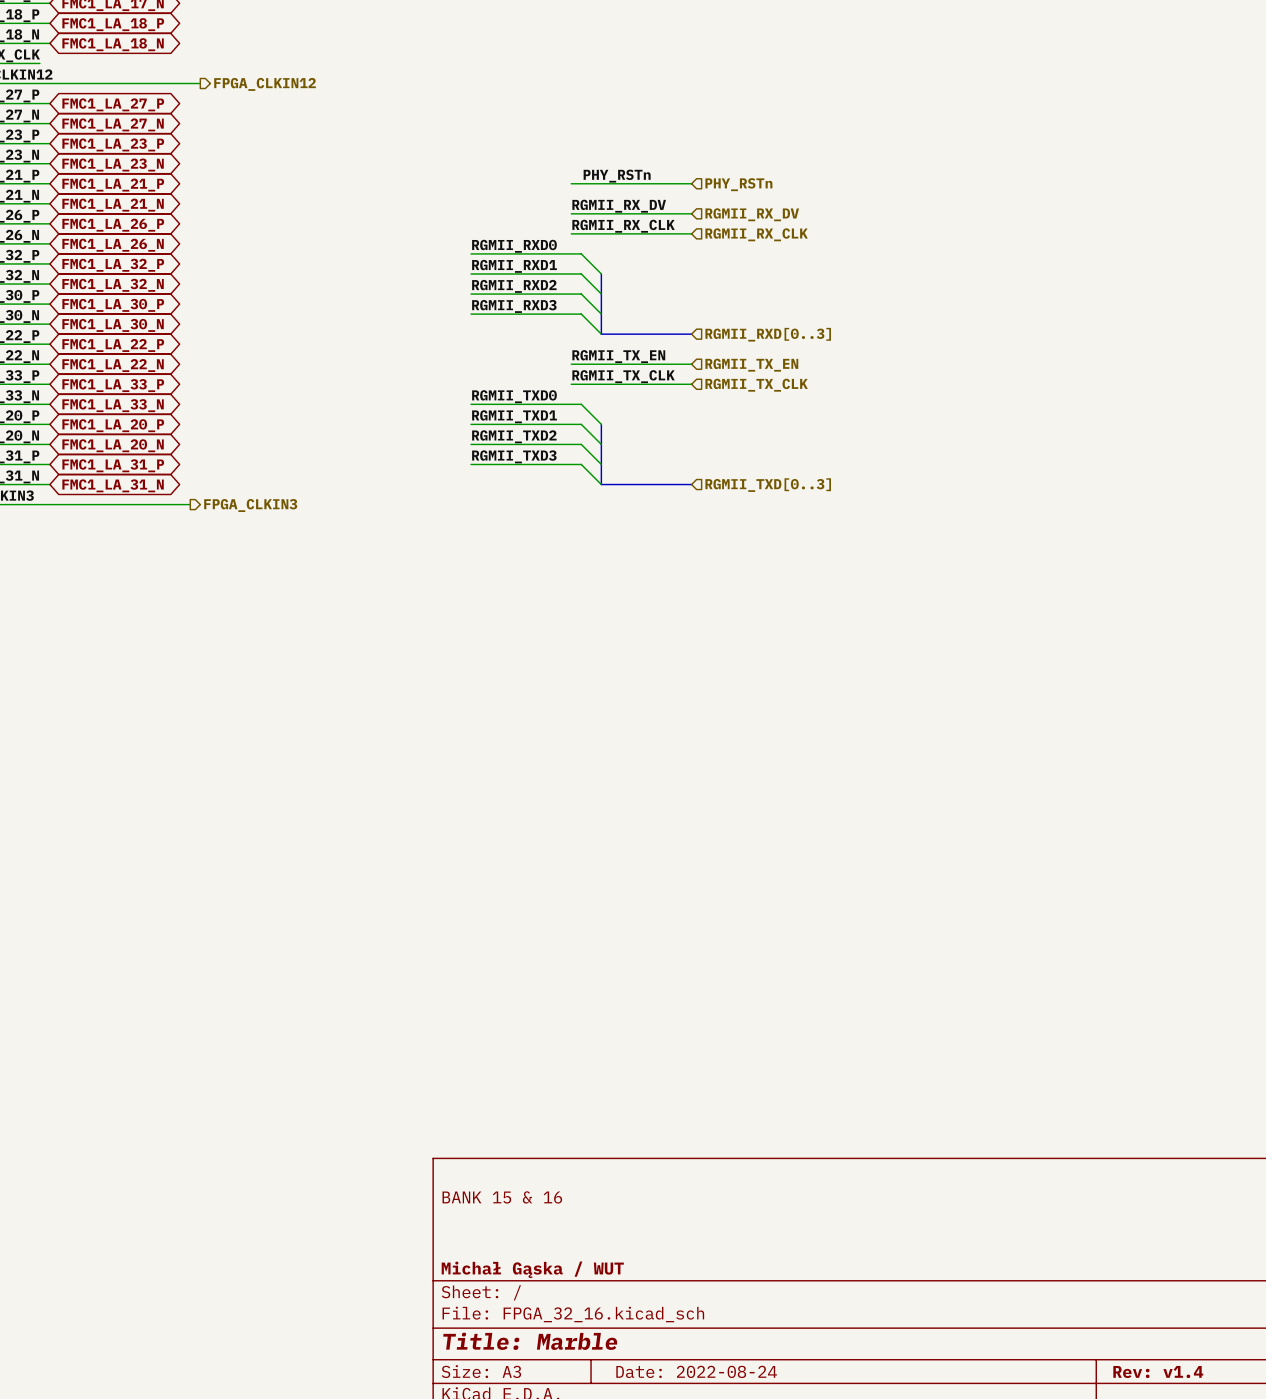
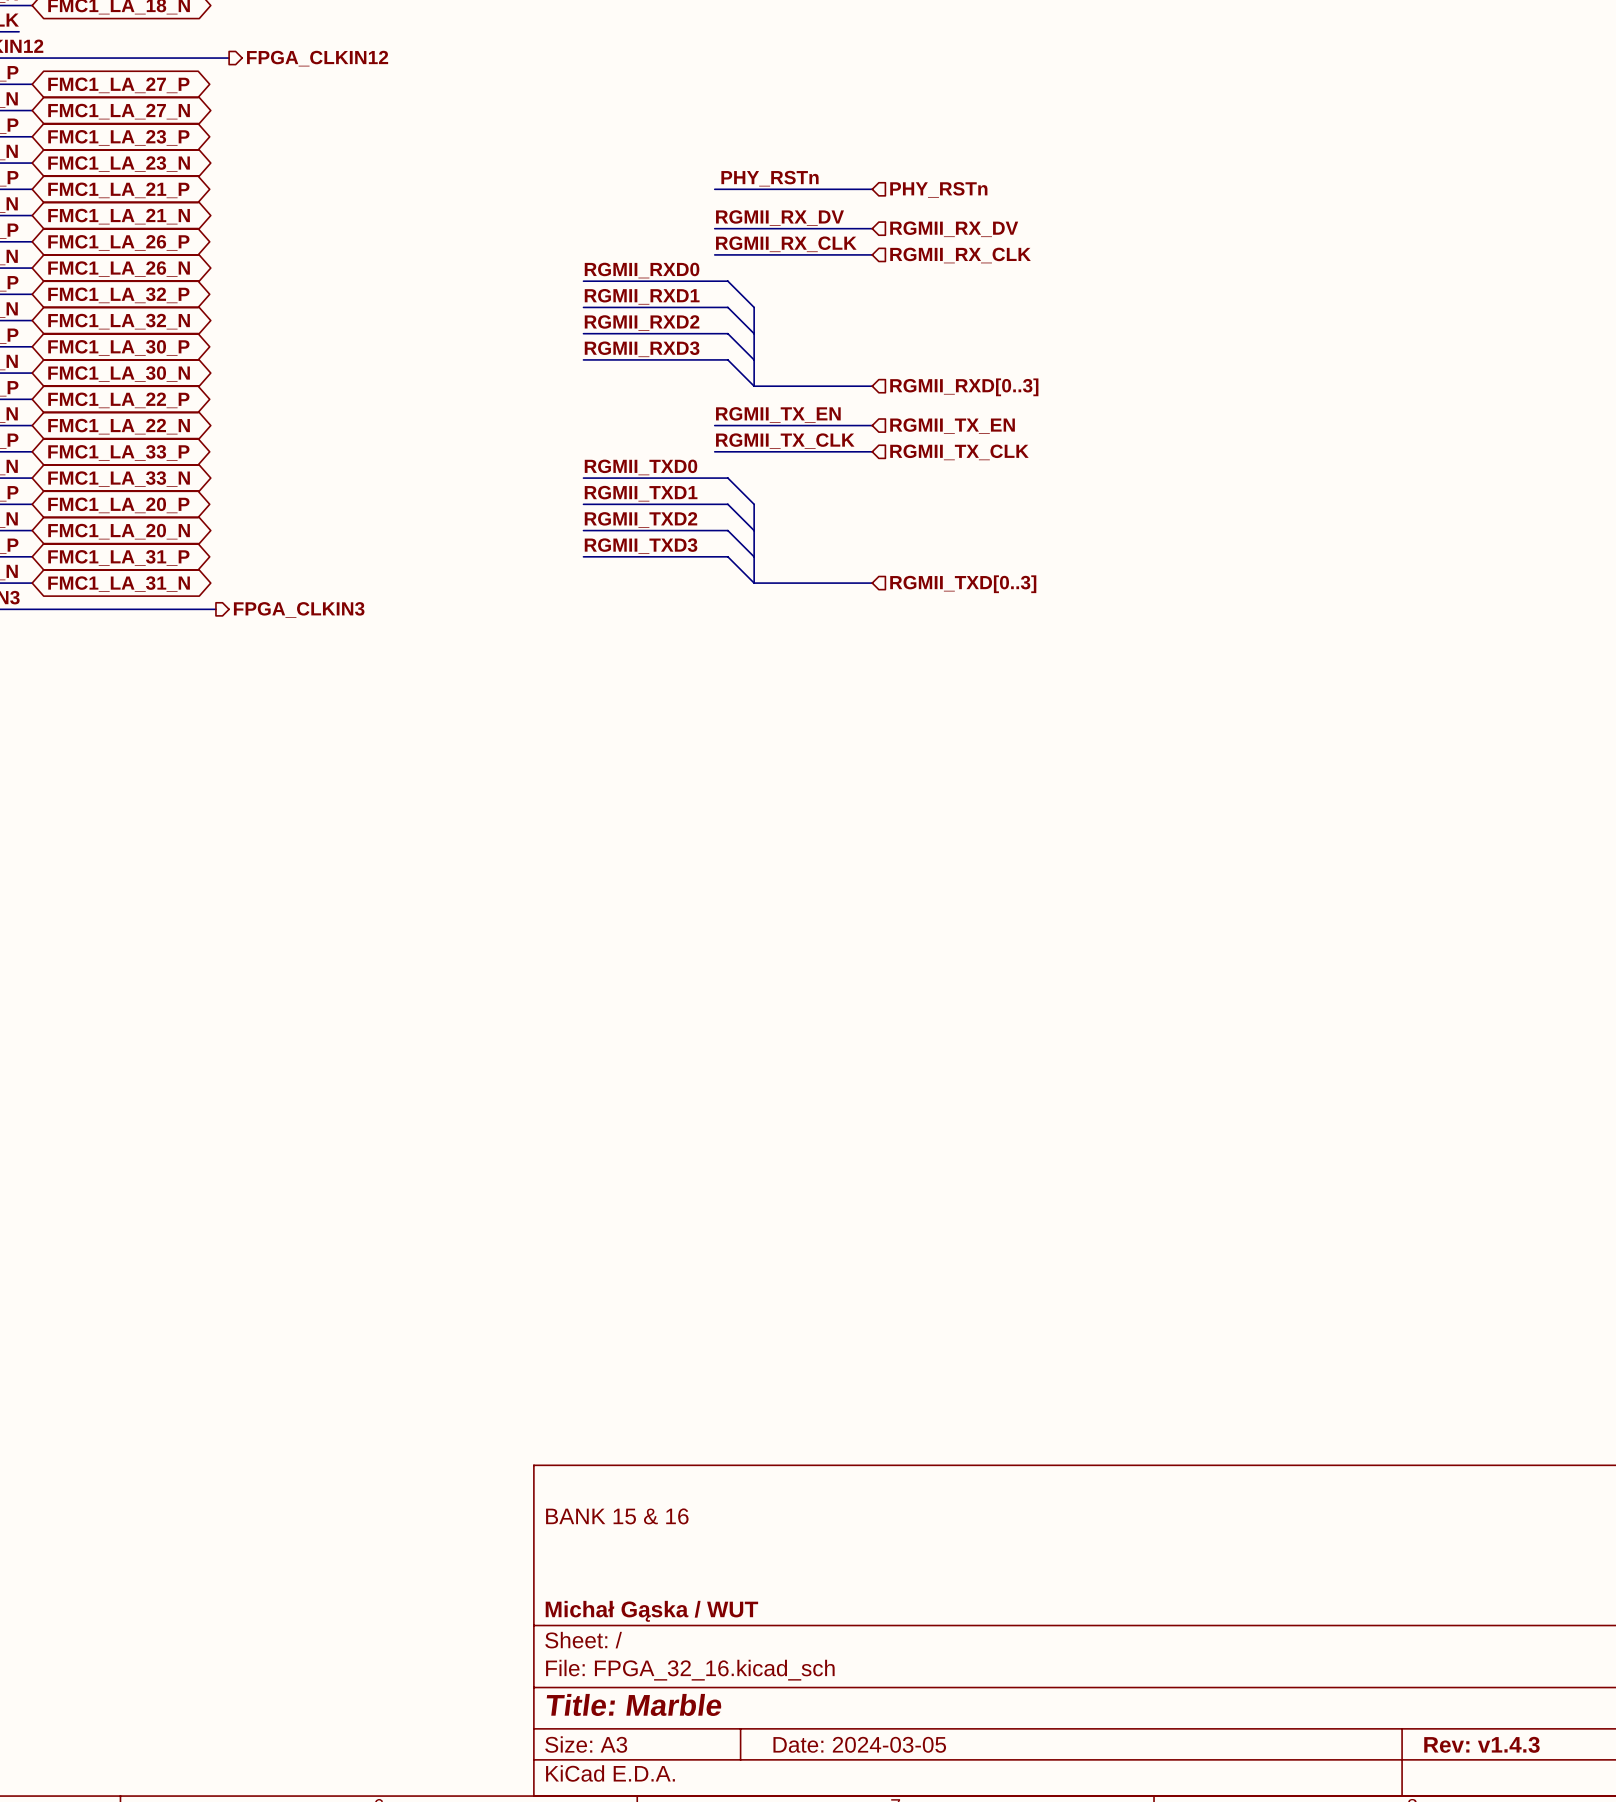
title block: Date: 2022-08-24 (696, 1371) -> Date: 2024-03-05 (859, 1744)
title block: Rev: v1.4 (1158, 1372) -> Rev: v1.4.3 (1481, 1744)

